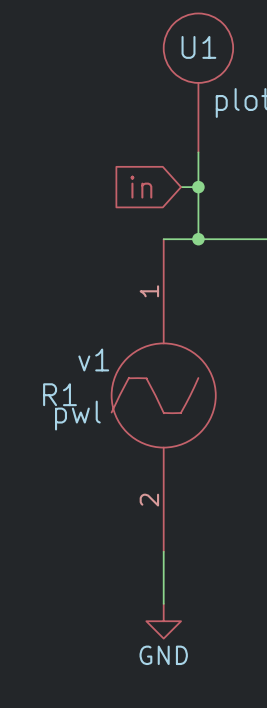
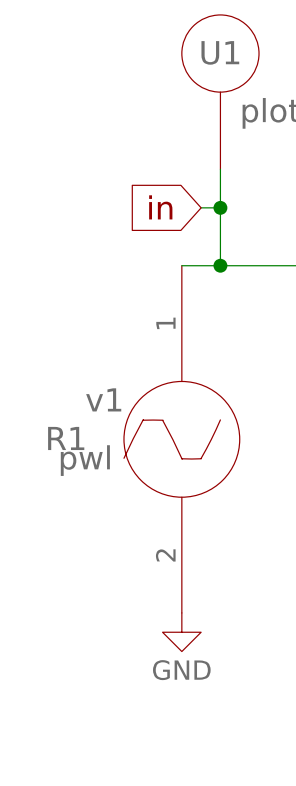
wire: (163, 551) (163, 603) -> none
power symbol position: GND (163, 621) -> GND (181, 632)

